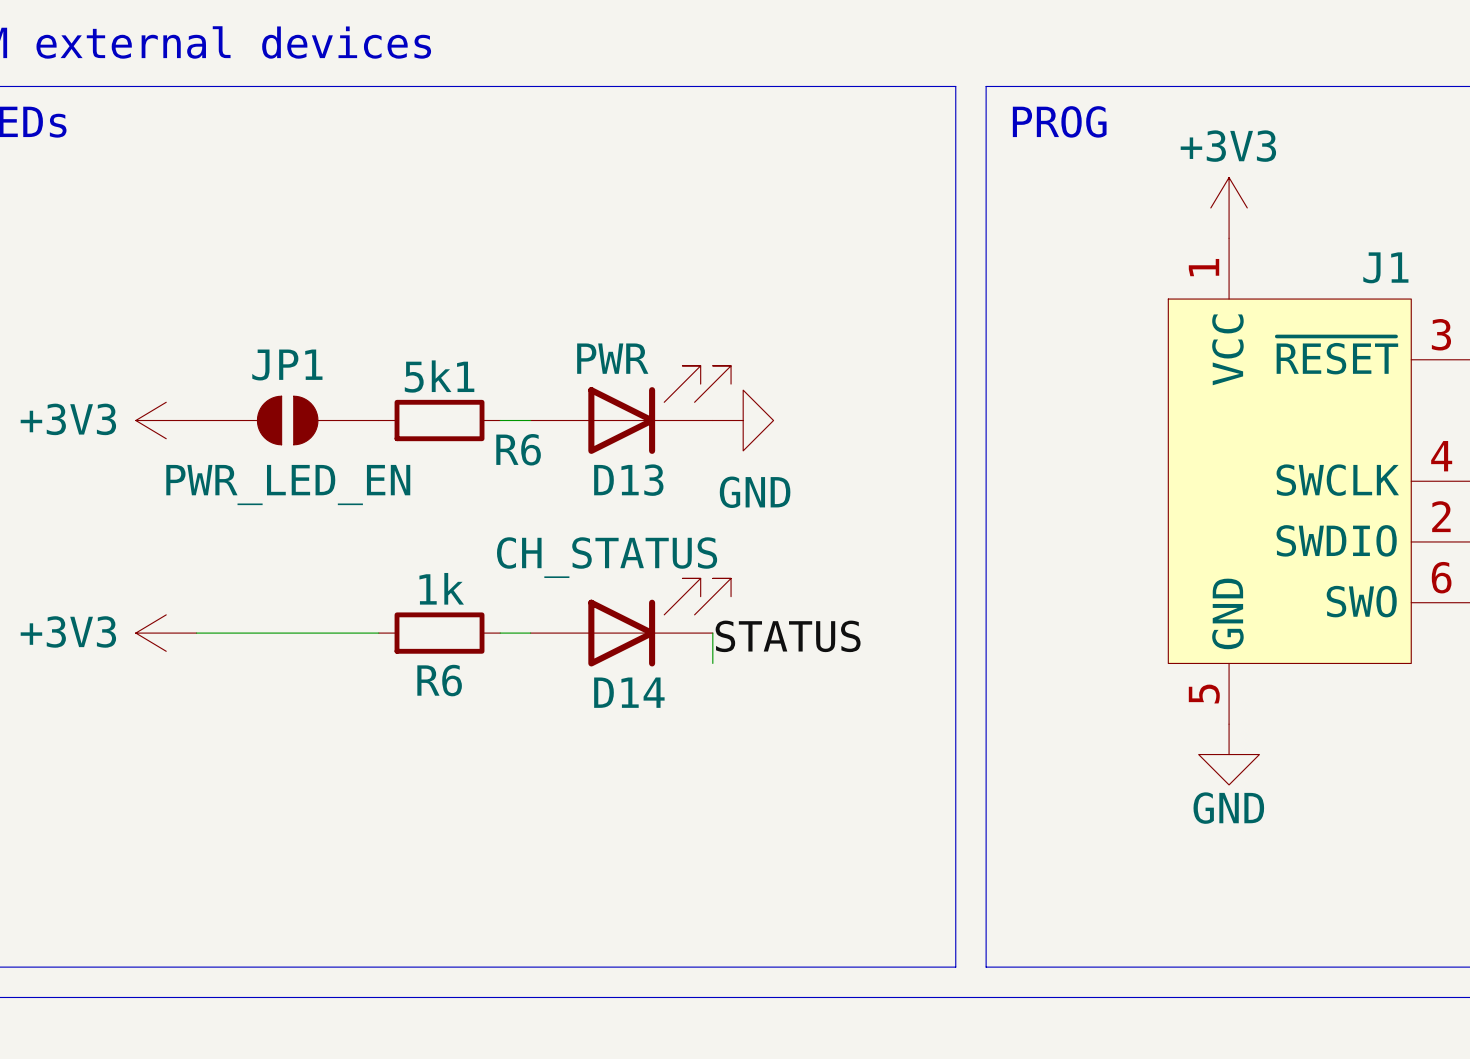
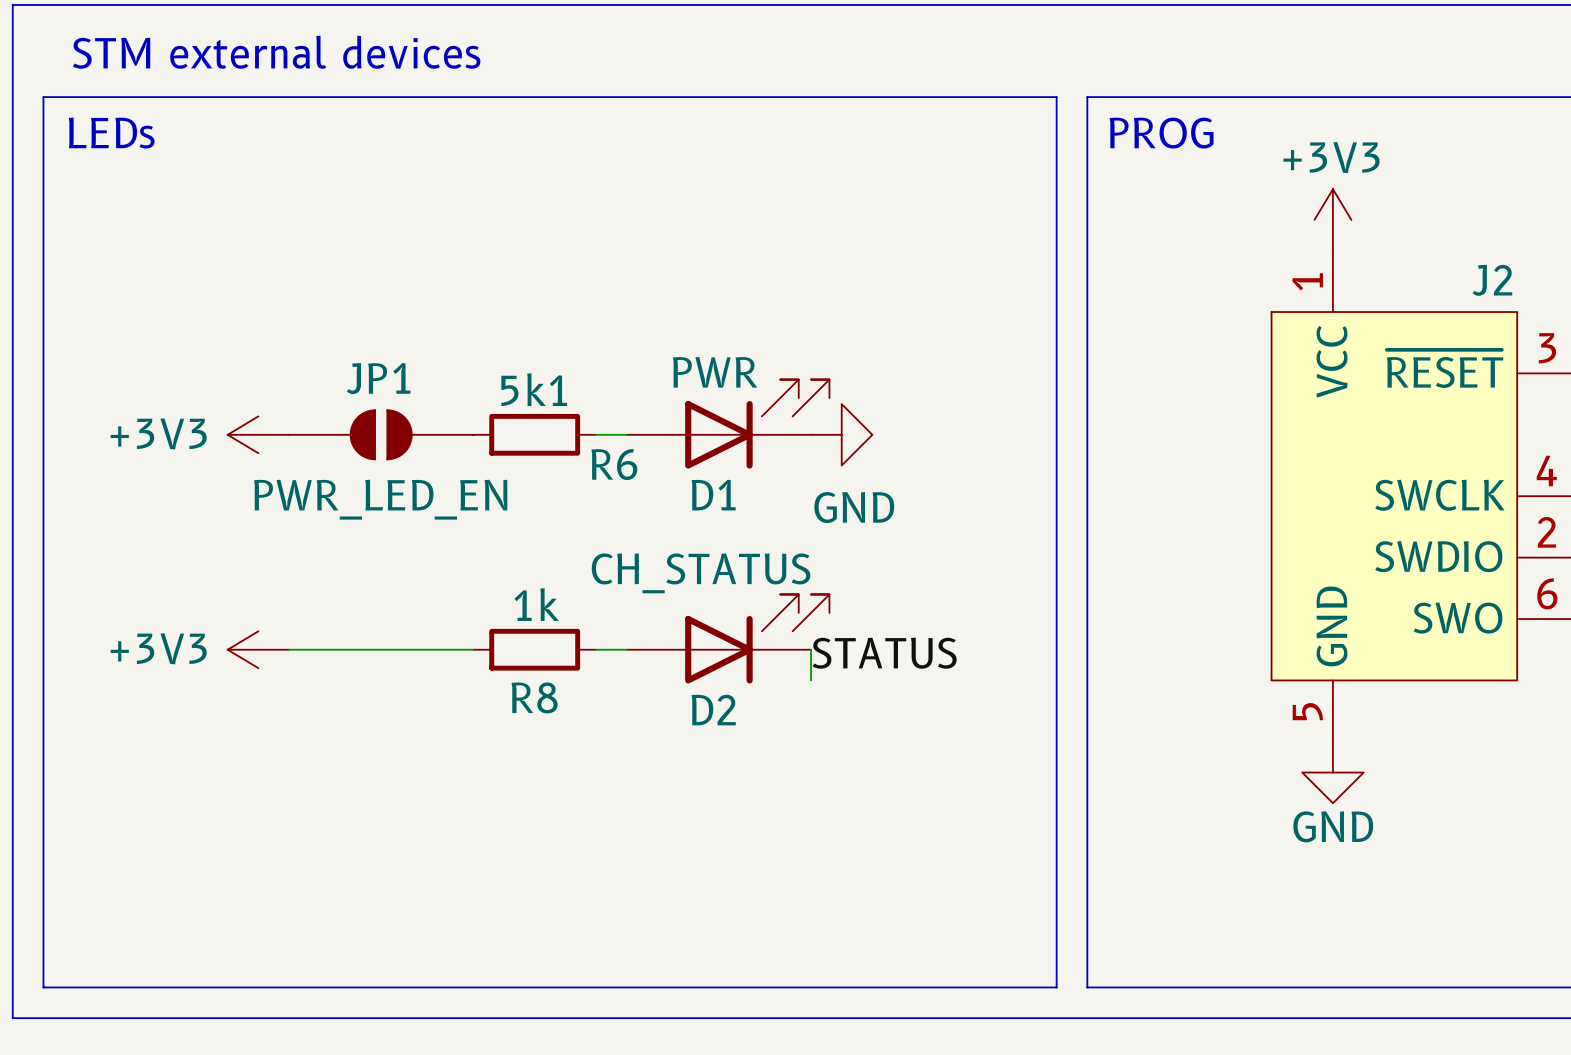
J1 name: J1 (1385, 267) -> J2 (1492, 280)
D13 name: D13 (628, 480) -> D1 (713, 495)
R6 name: R6 (439, 680) -> R8 (534, 697)
D14 name: D14 (629, 692) -> D2 (713, 710)

